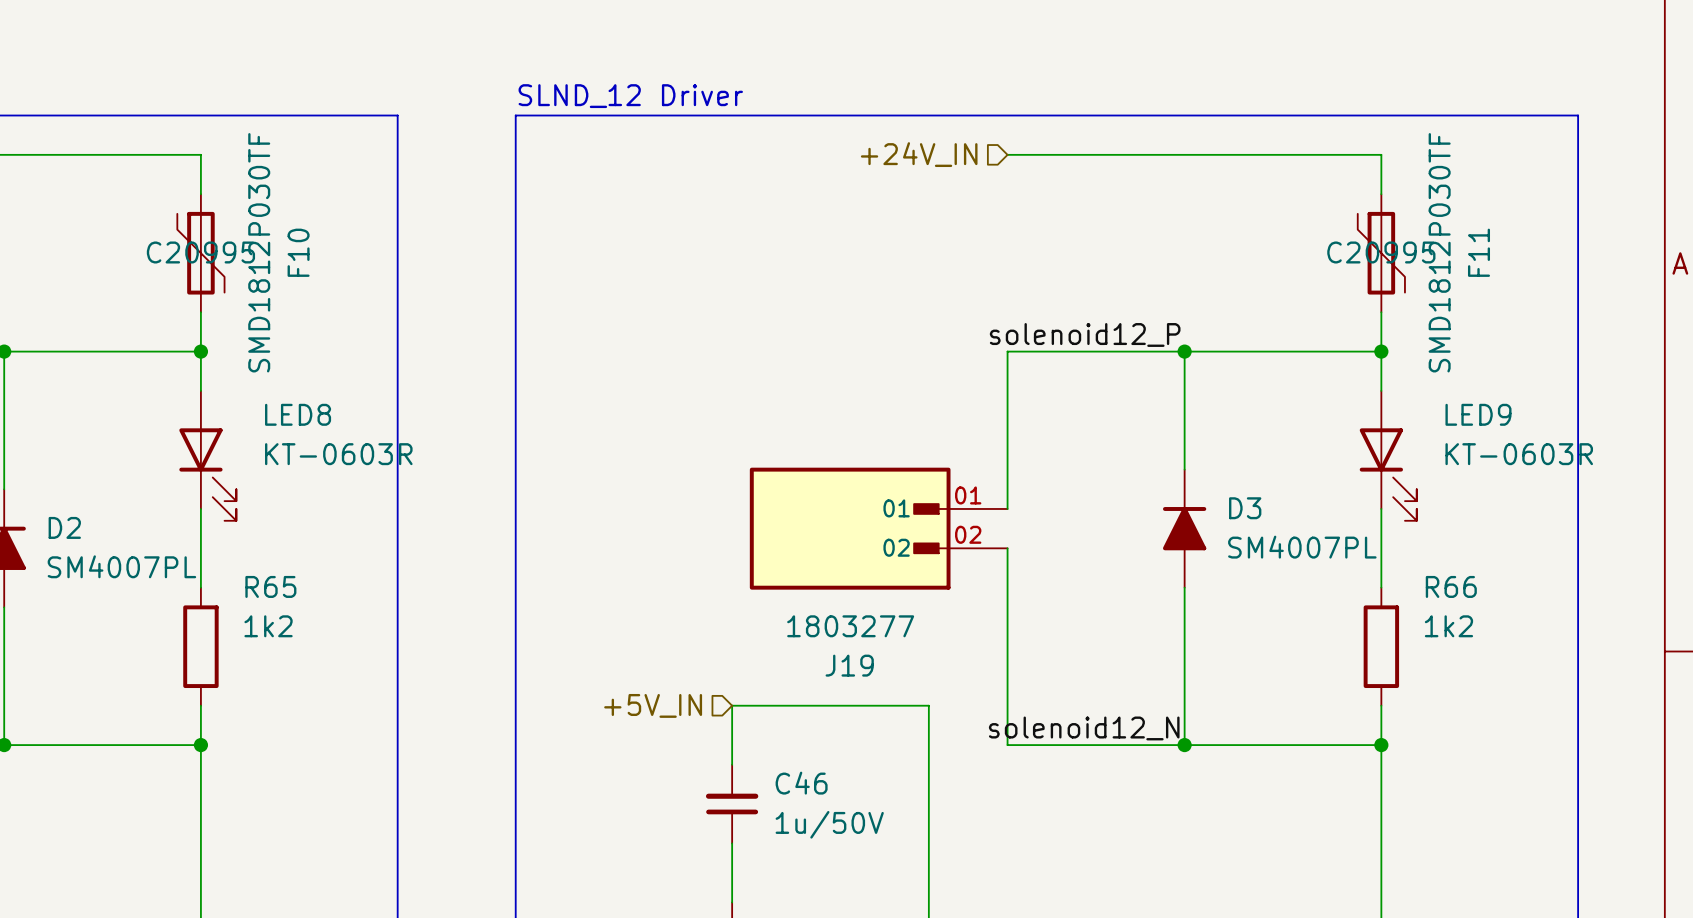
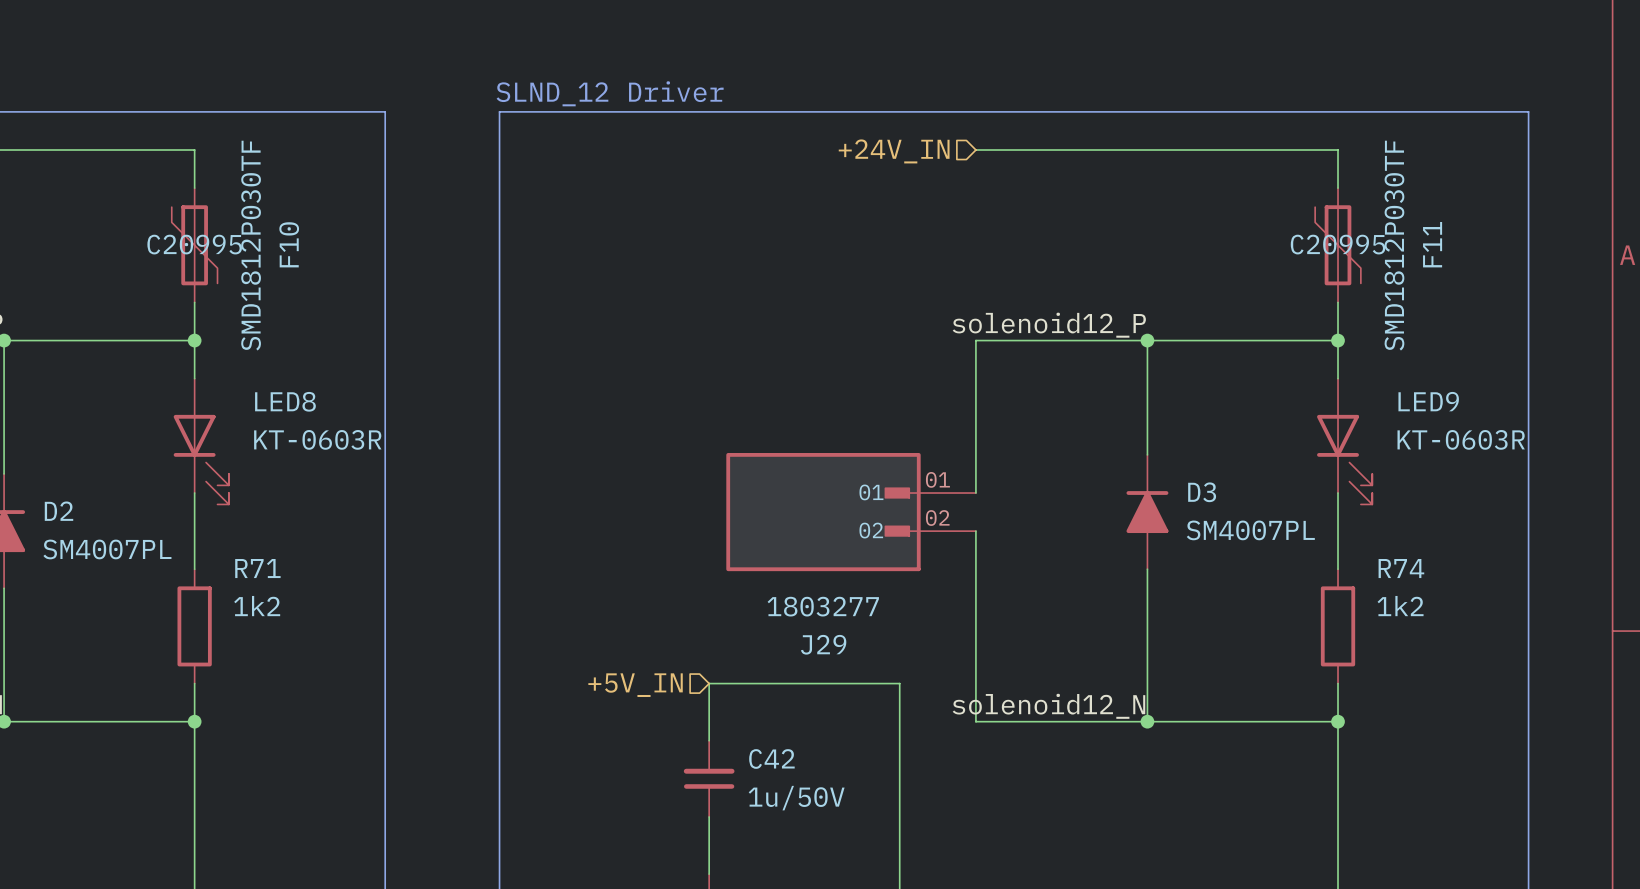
R65 name: R65 (270, 586) -> R71 (257, 568)
R66 name: R66 (1451, 586) -> R74 (1401, 568)
J19 name: J19 (849, 665) -> J29 (823, 644)
C46 name: C46 (801, 783) -> C42 (771, 758)

